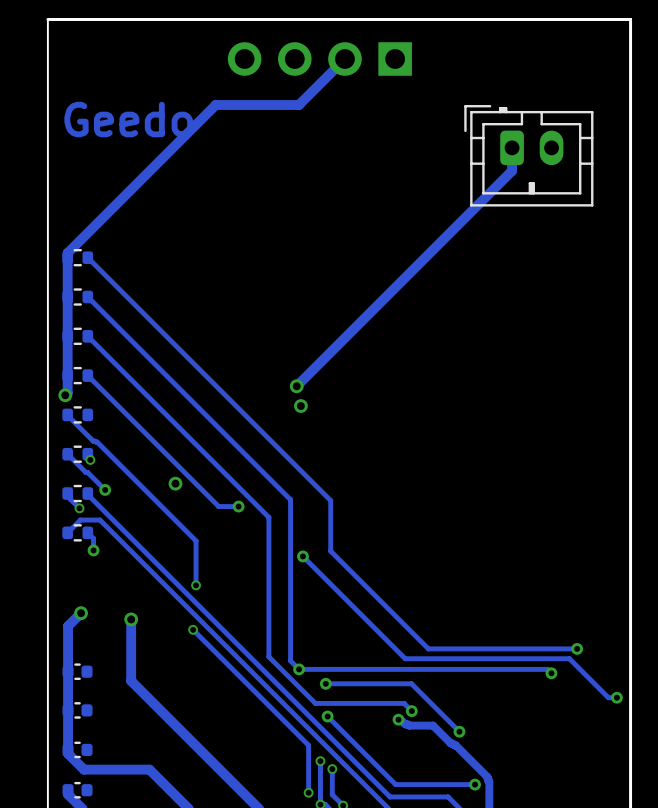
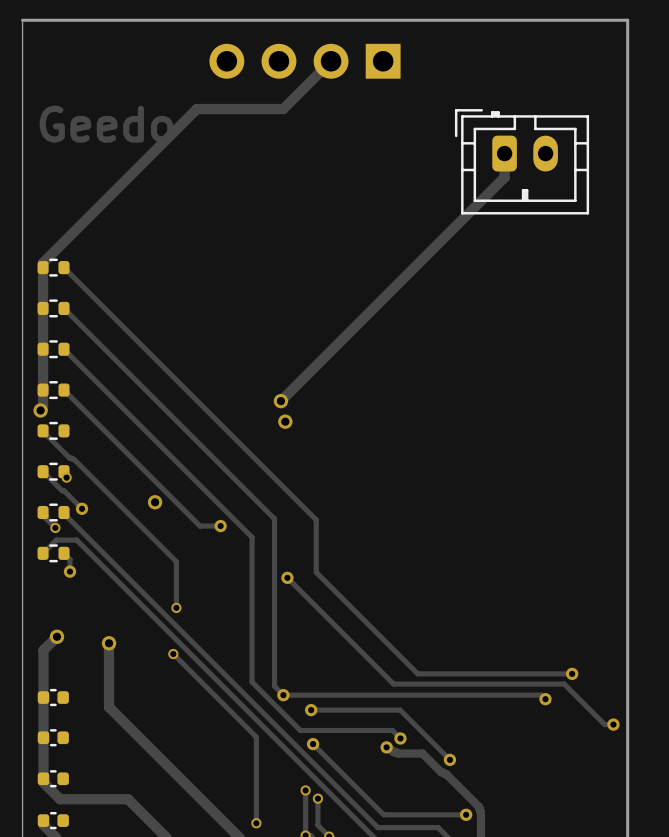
track: (273, 709) (308, 745) (308, 792) -> (256, 737) (256, 823)
via position: (308, 792) -> (256, 823)

